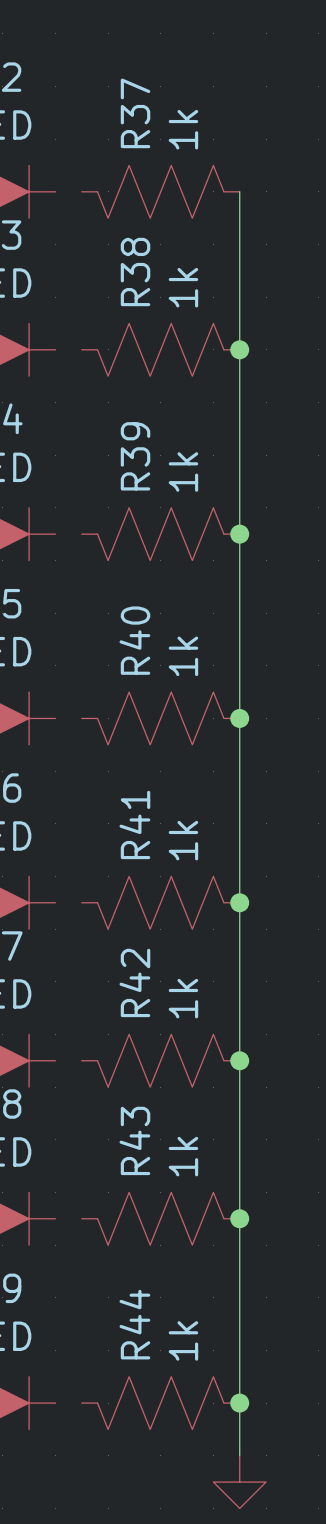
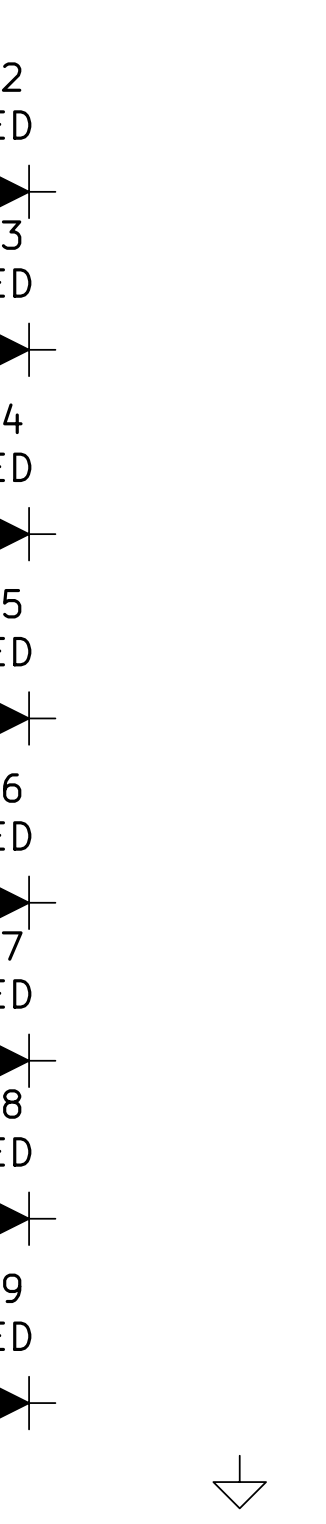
R37: 1k (160, 191) -> none
wire: (239, 191) (239, 1455) -> none
R38: 1k (160, 349) -> none
junction: (239, 349) -> none
R39: 1k (160, 534) -> none
junction: (239, 534) -> none
R40: 1k (160, 718) -> none
junction: (239, 718) -> none
R41: 1k (160, 902) -> none
junction: (239, 902) -> none
R42: 1k (160, 1060) -> none
junction: (239, 1060) -> none
R43: 1k (160, 1218) -> none
junction: (239, 1218) -> none
R44: 1k (160, 1403) -> none
junction: (239, 1403) -> none

